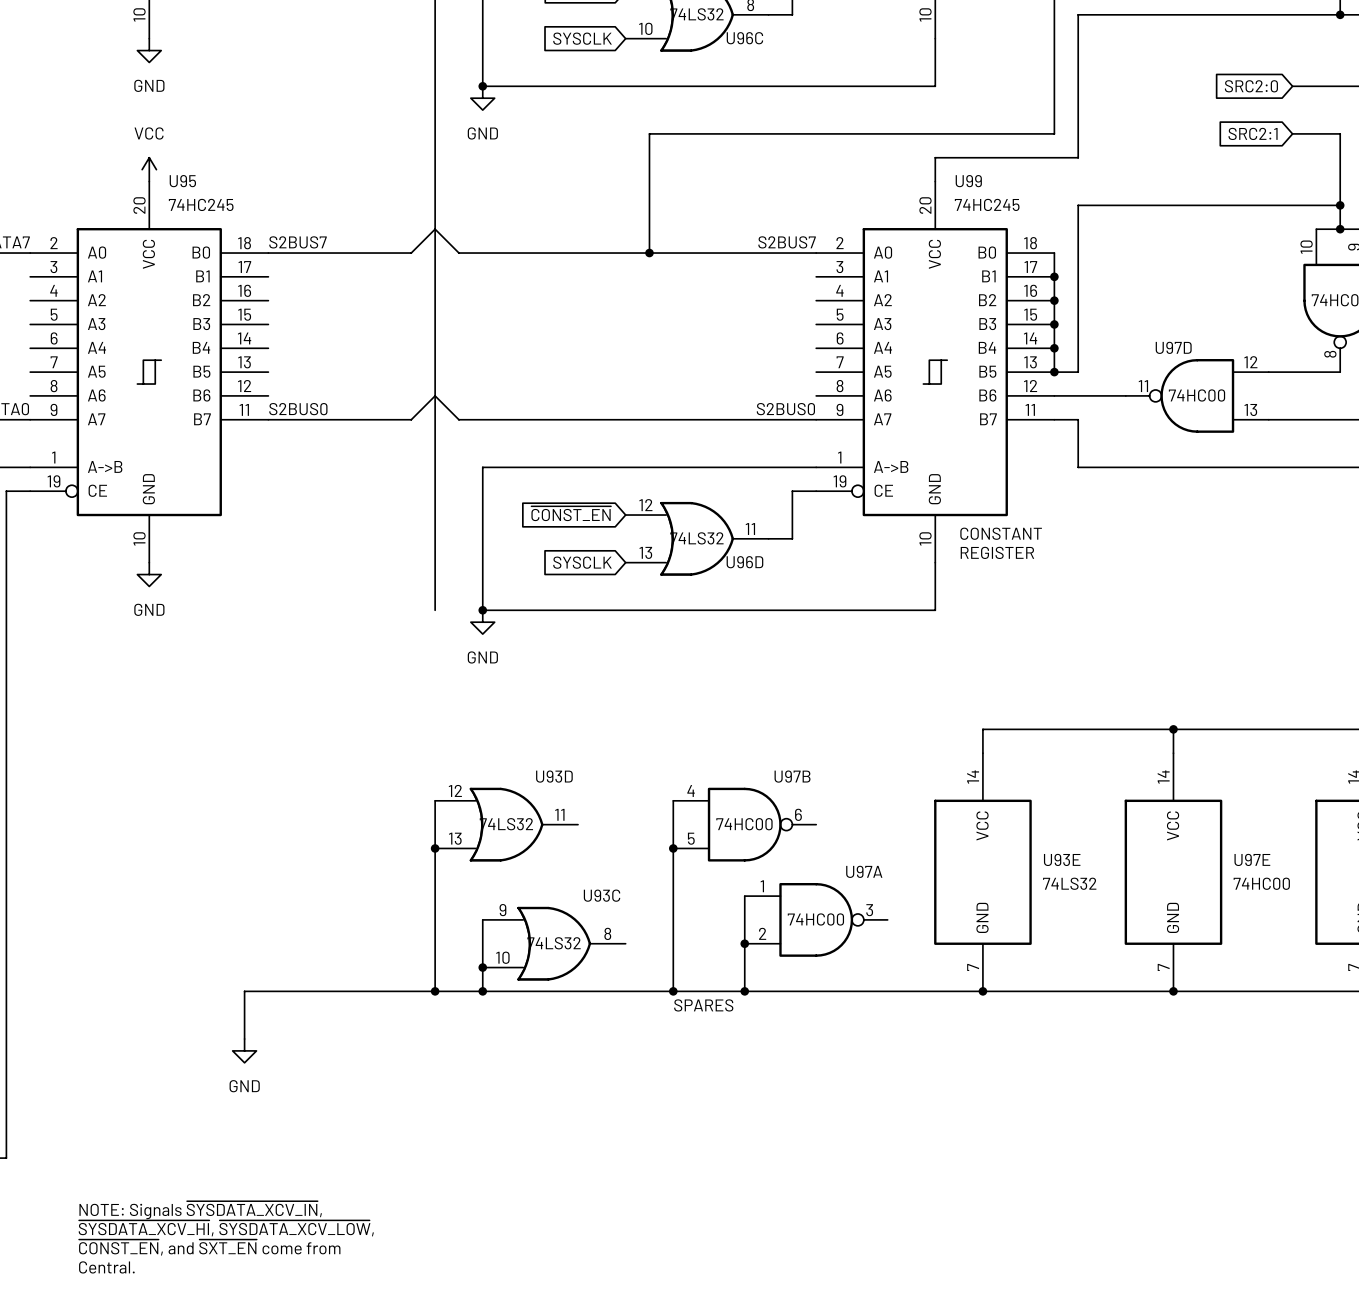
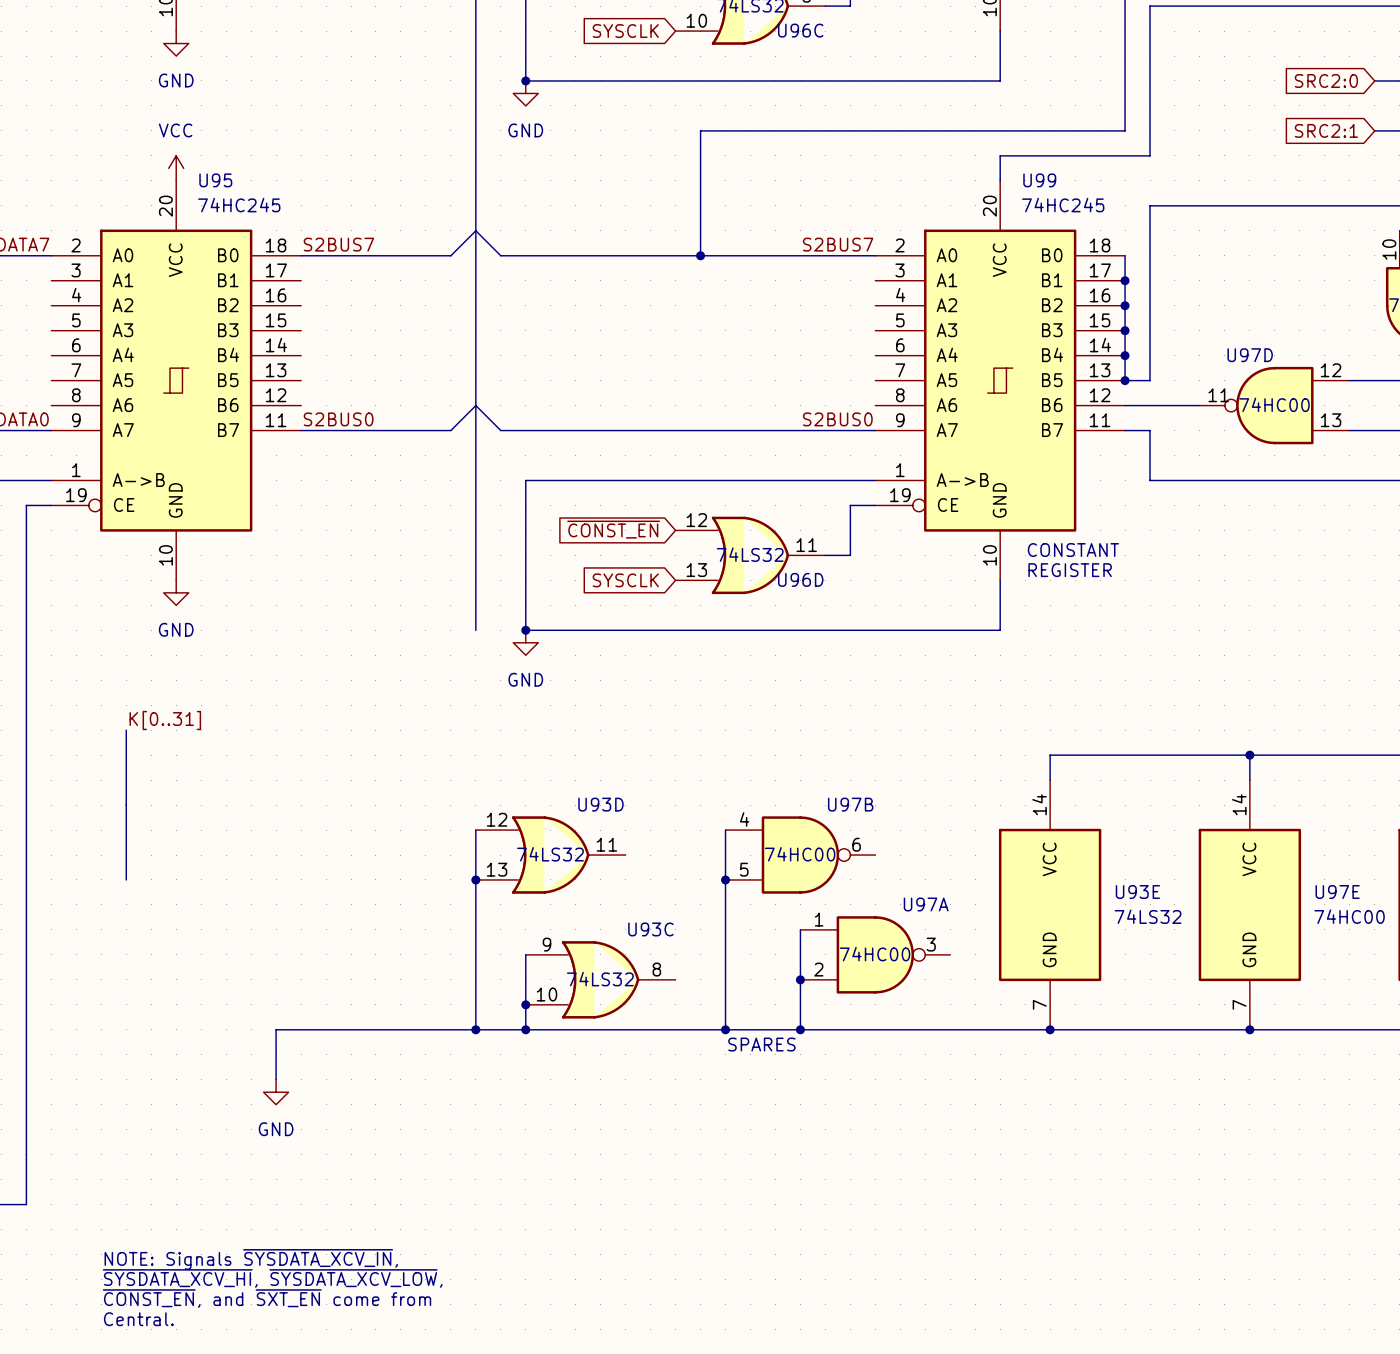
label: none -> K[0..31] (165, 720)
bus: none -> (126, 730) (126, 879)

